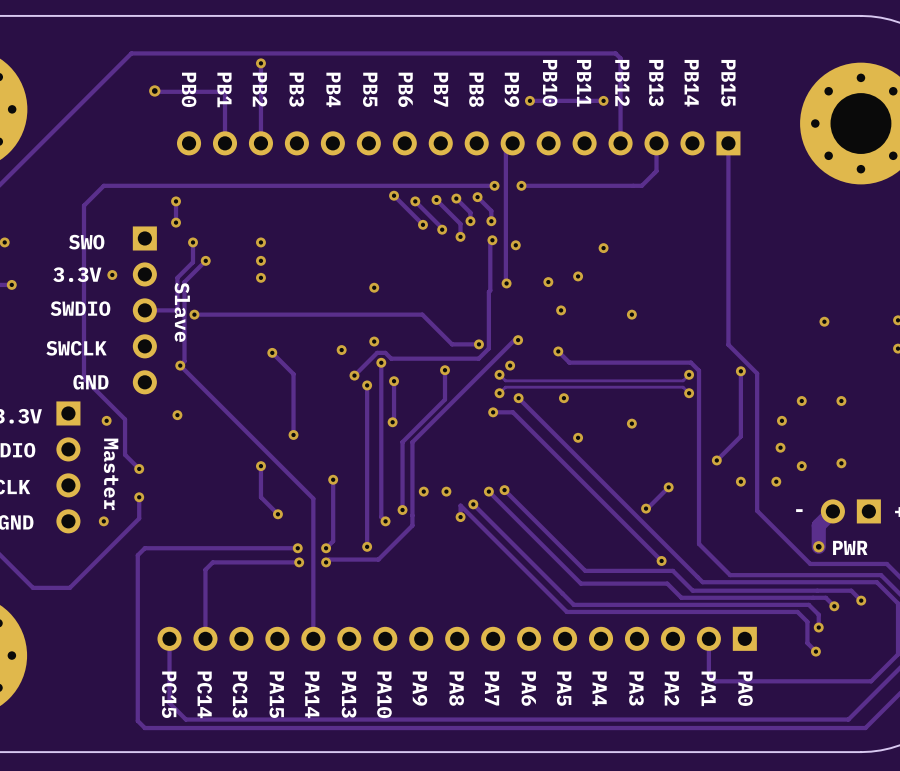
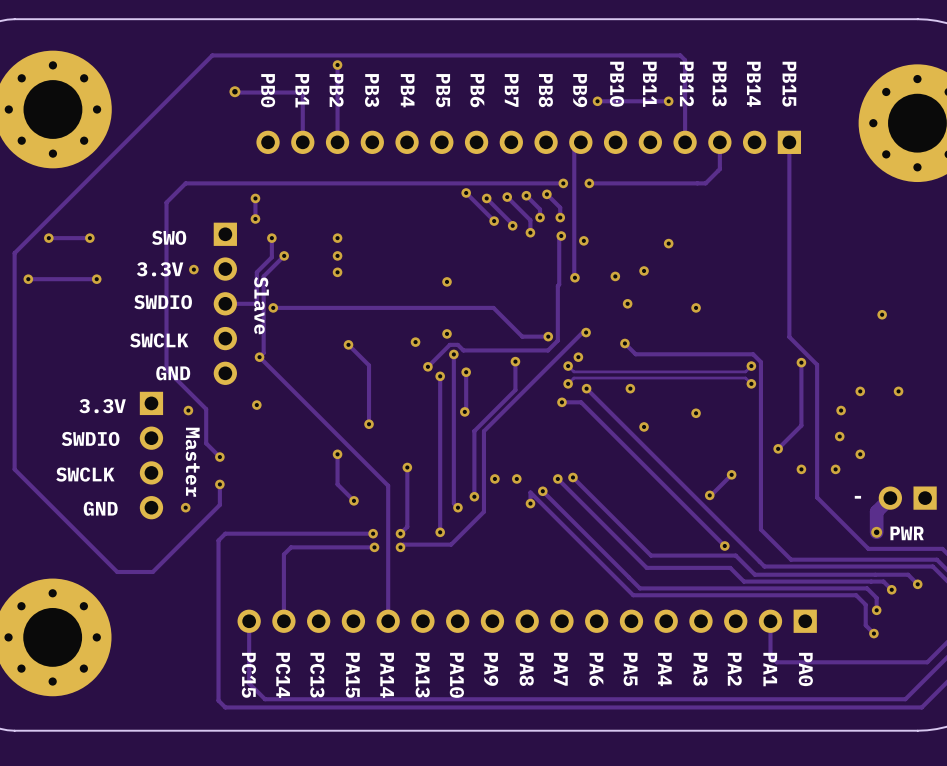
via: (841, 463) -> none

